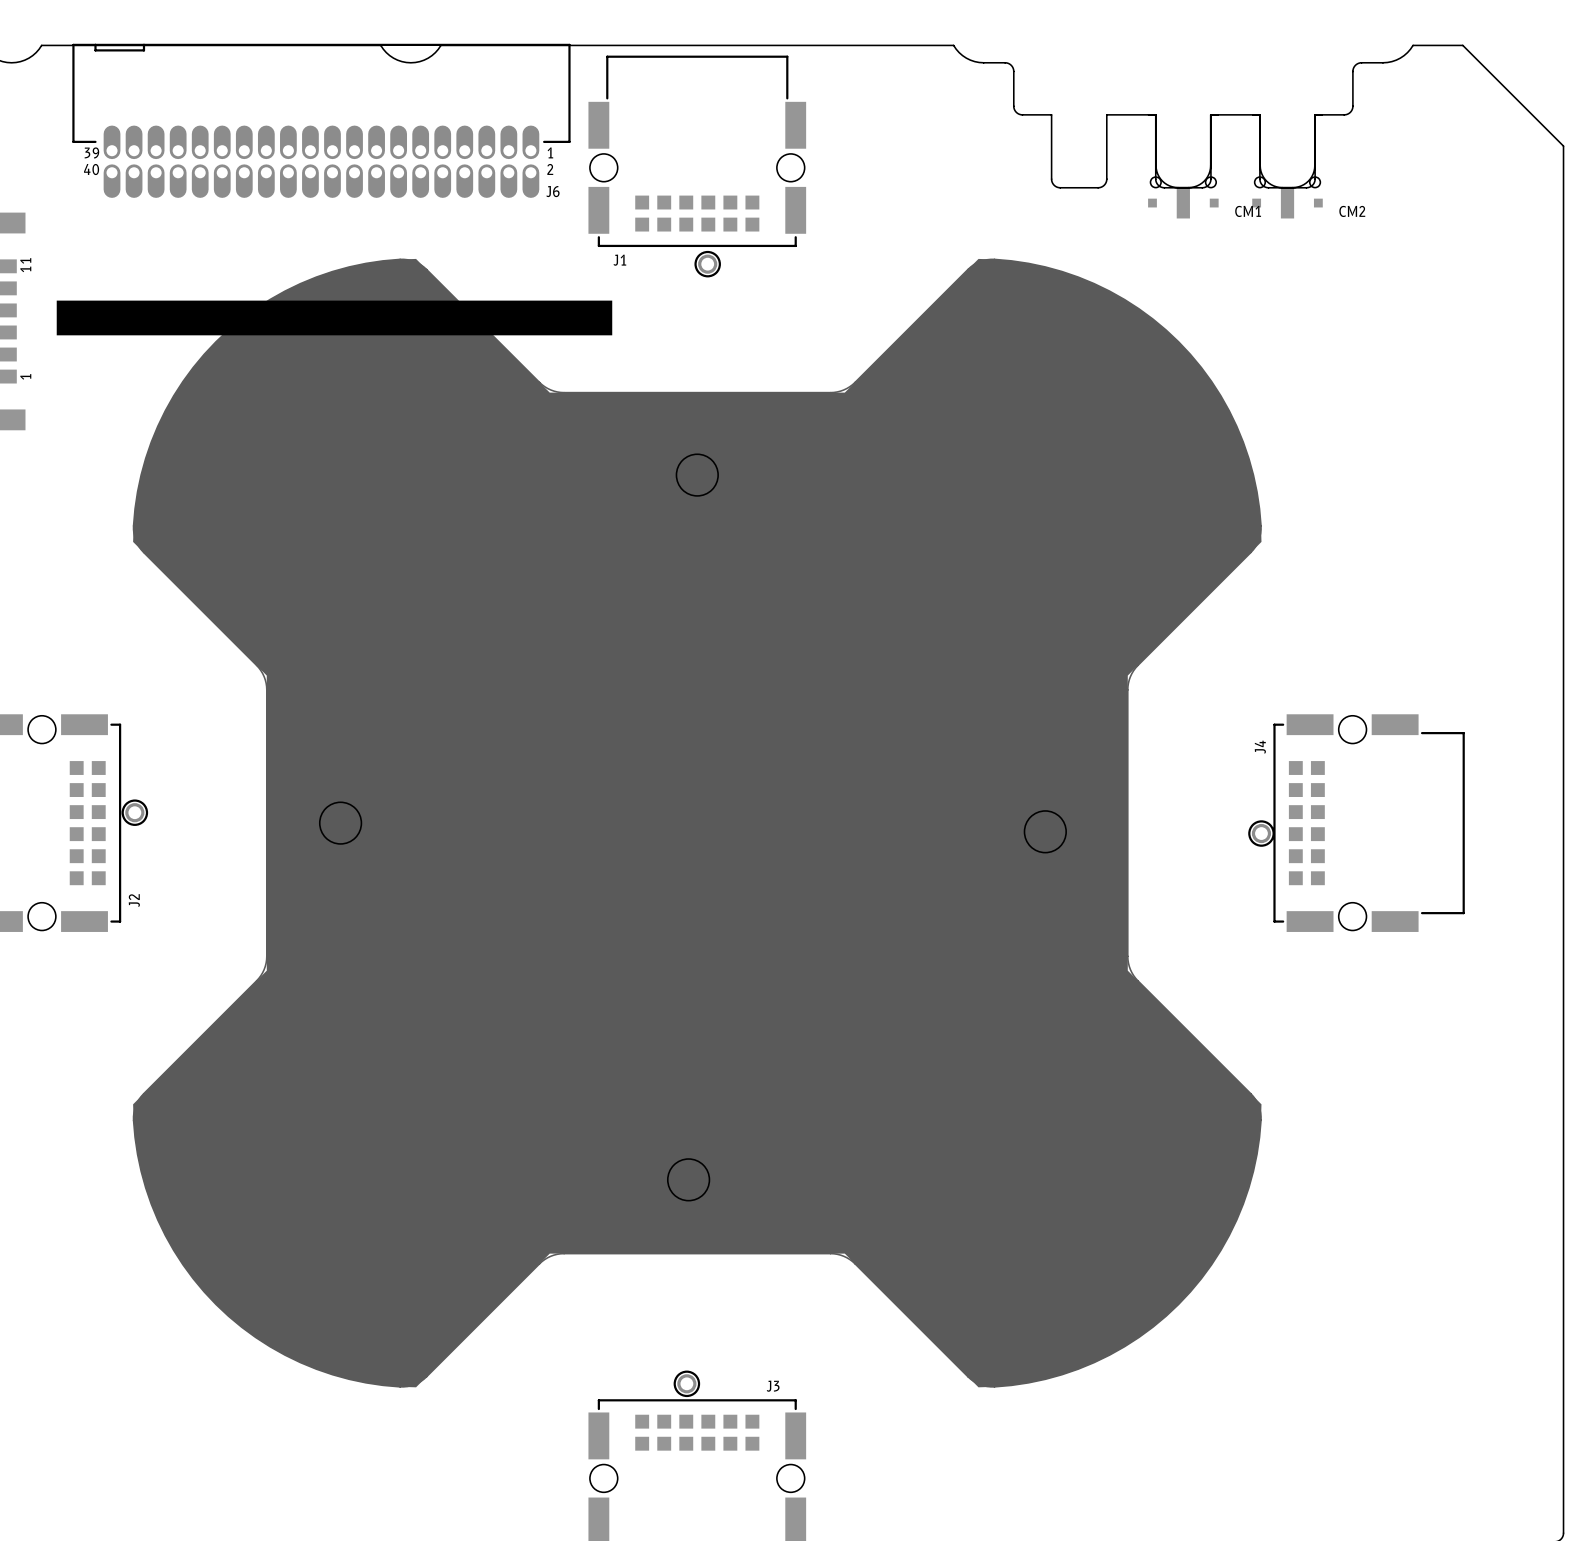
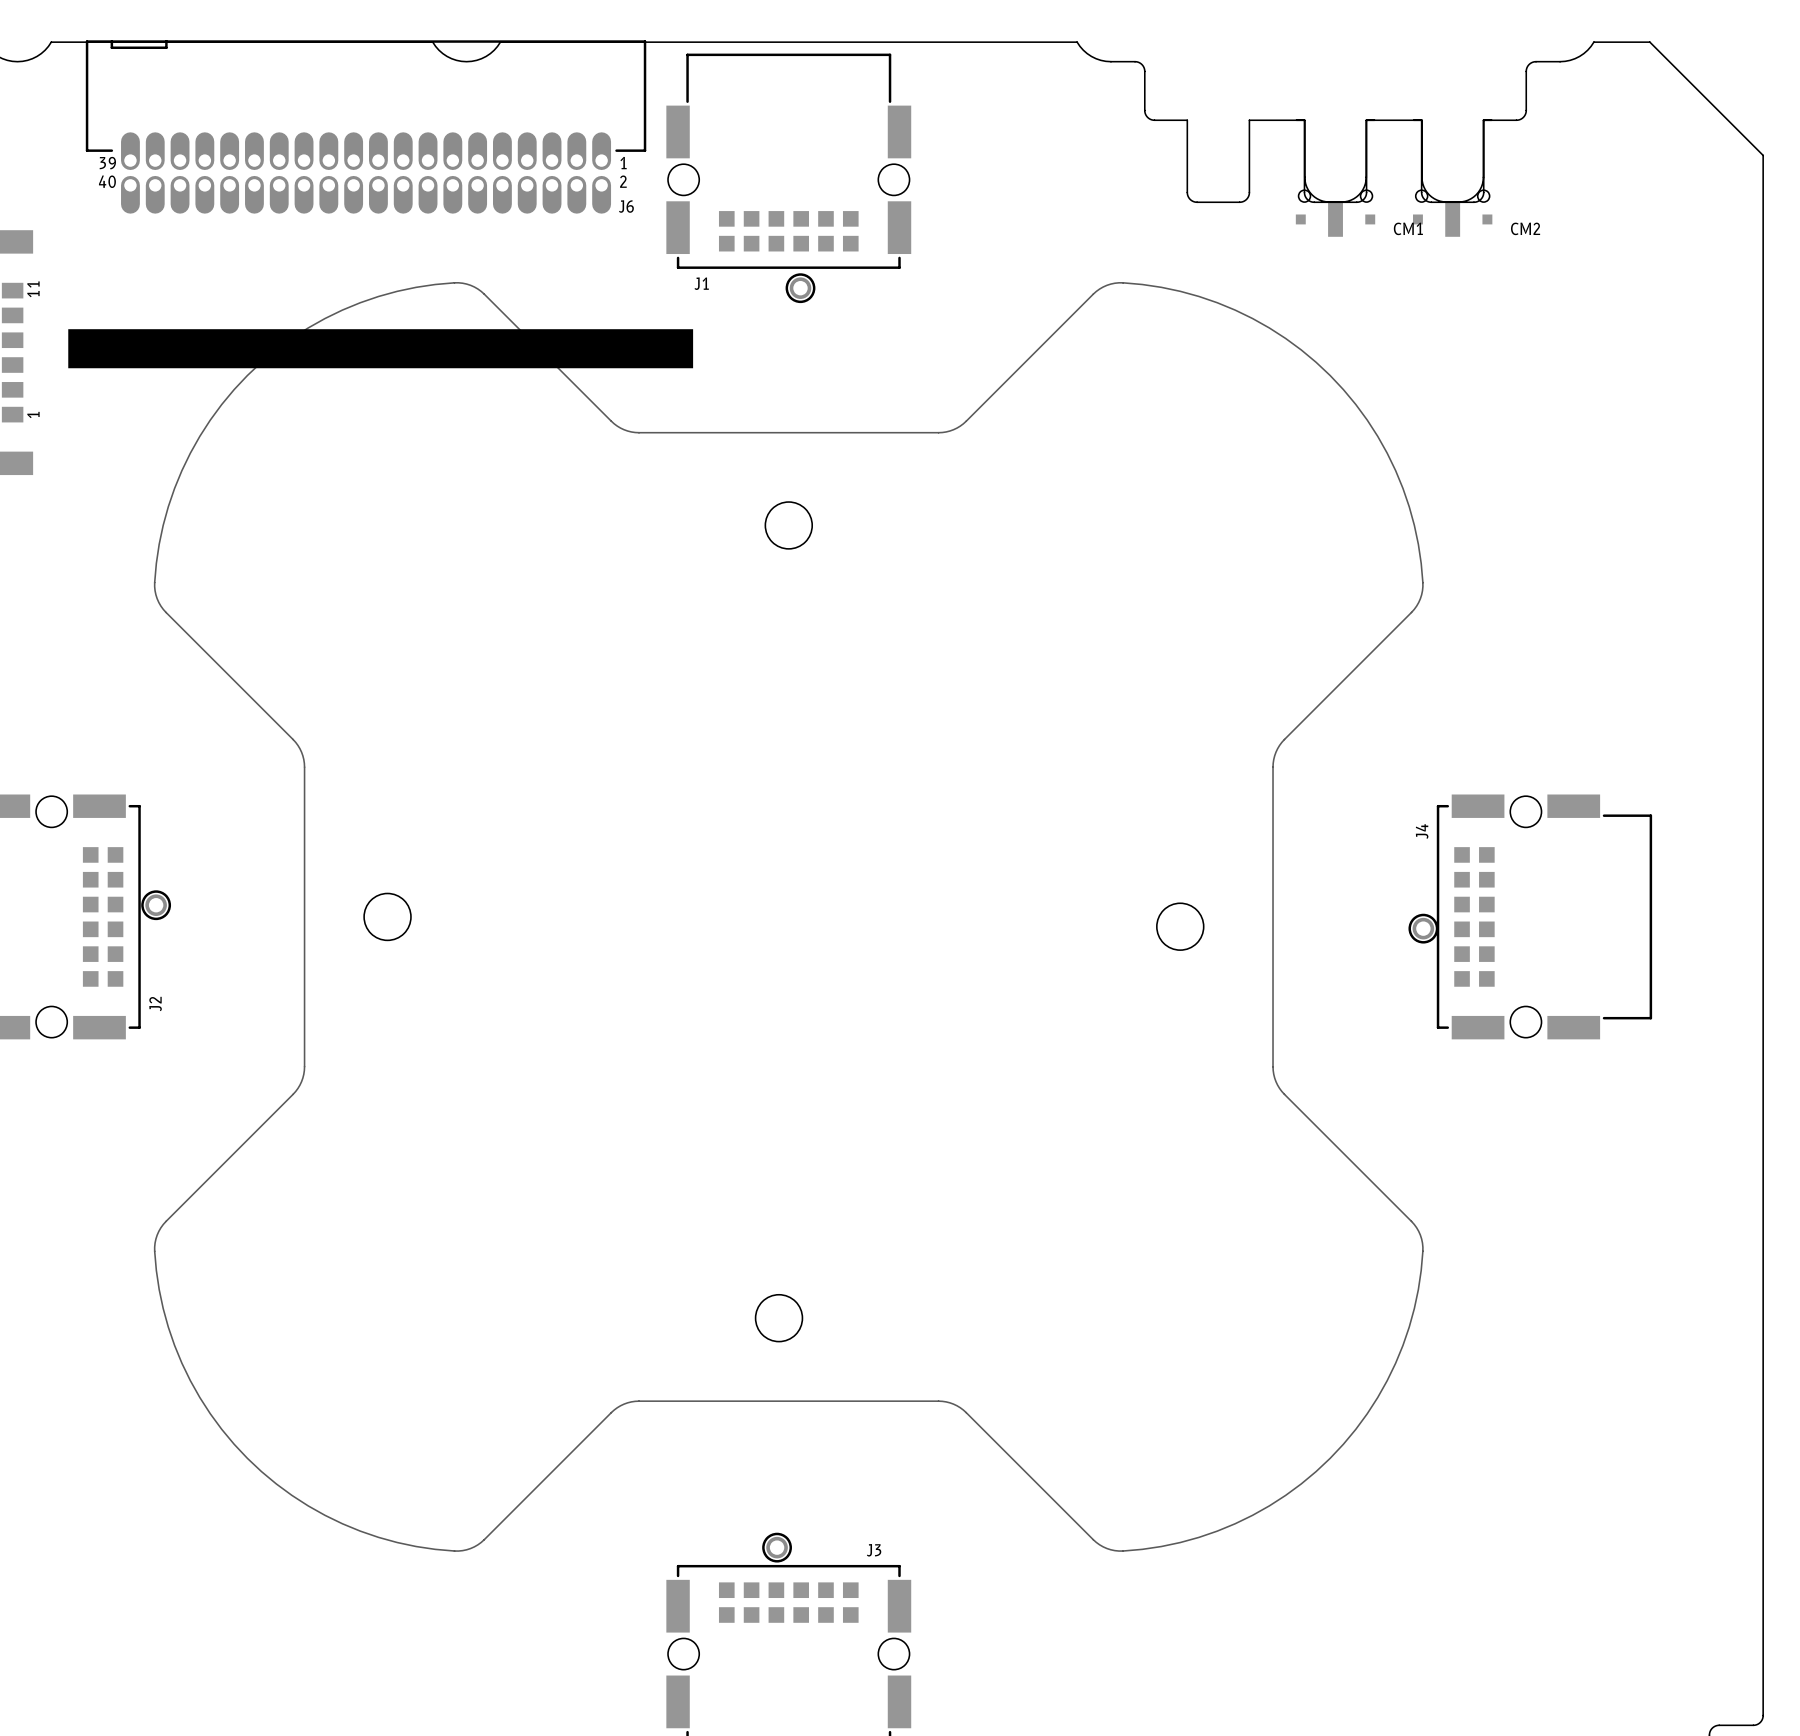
drawing: [133, 258, 1262, 1388] -> none

